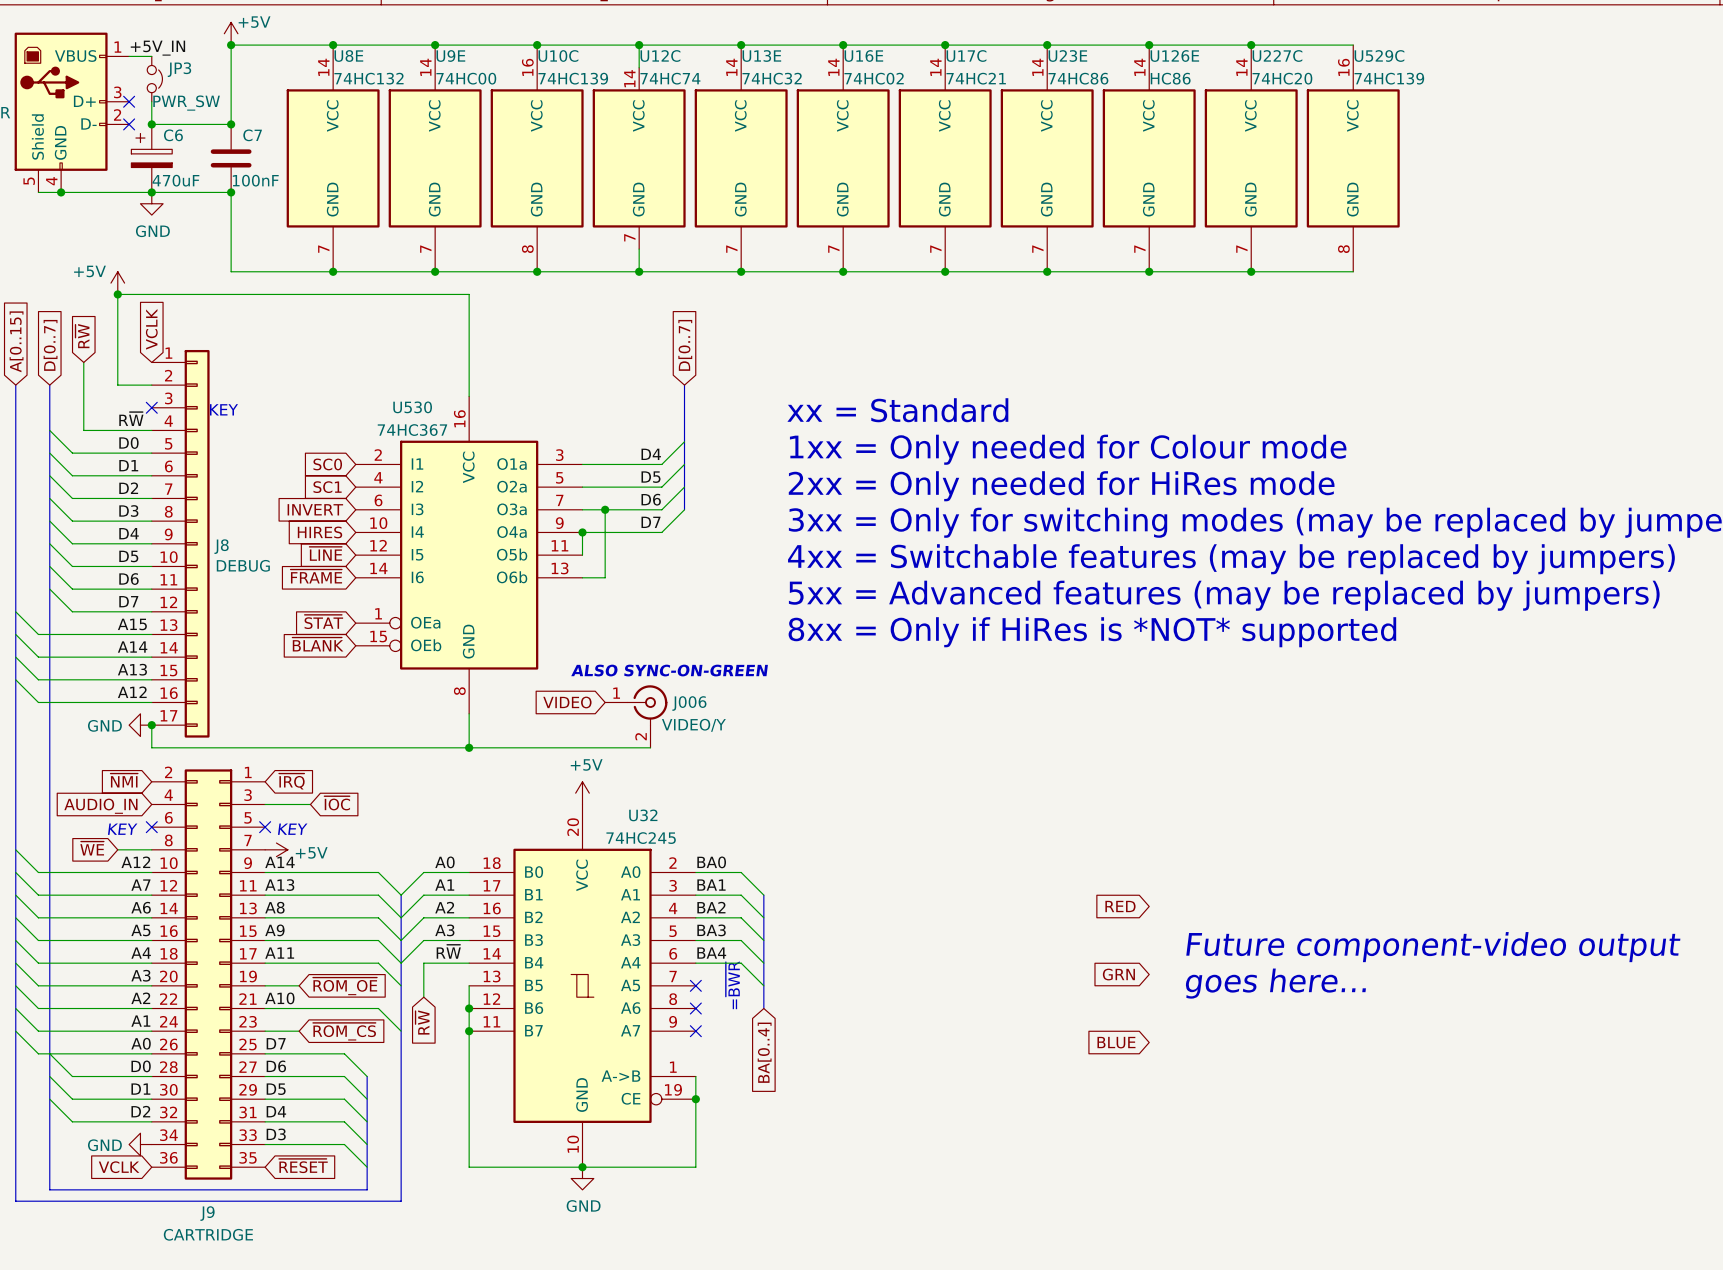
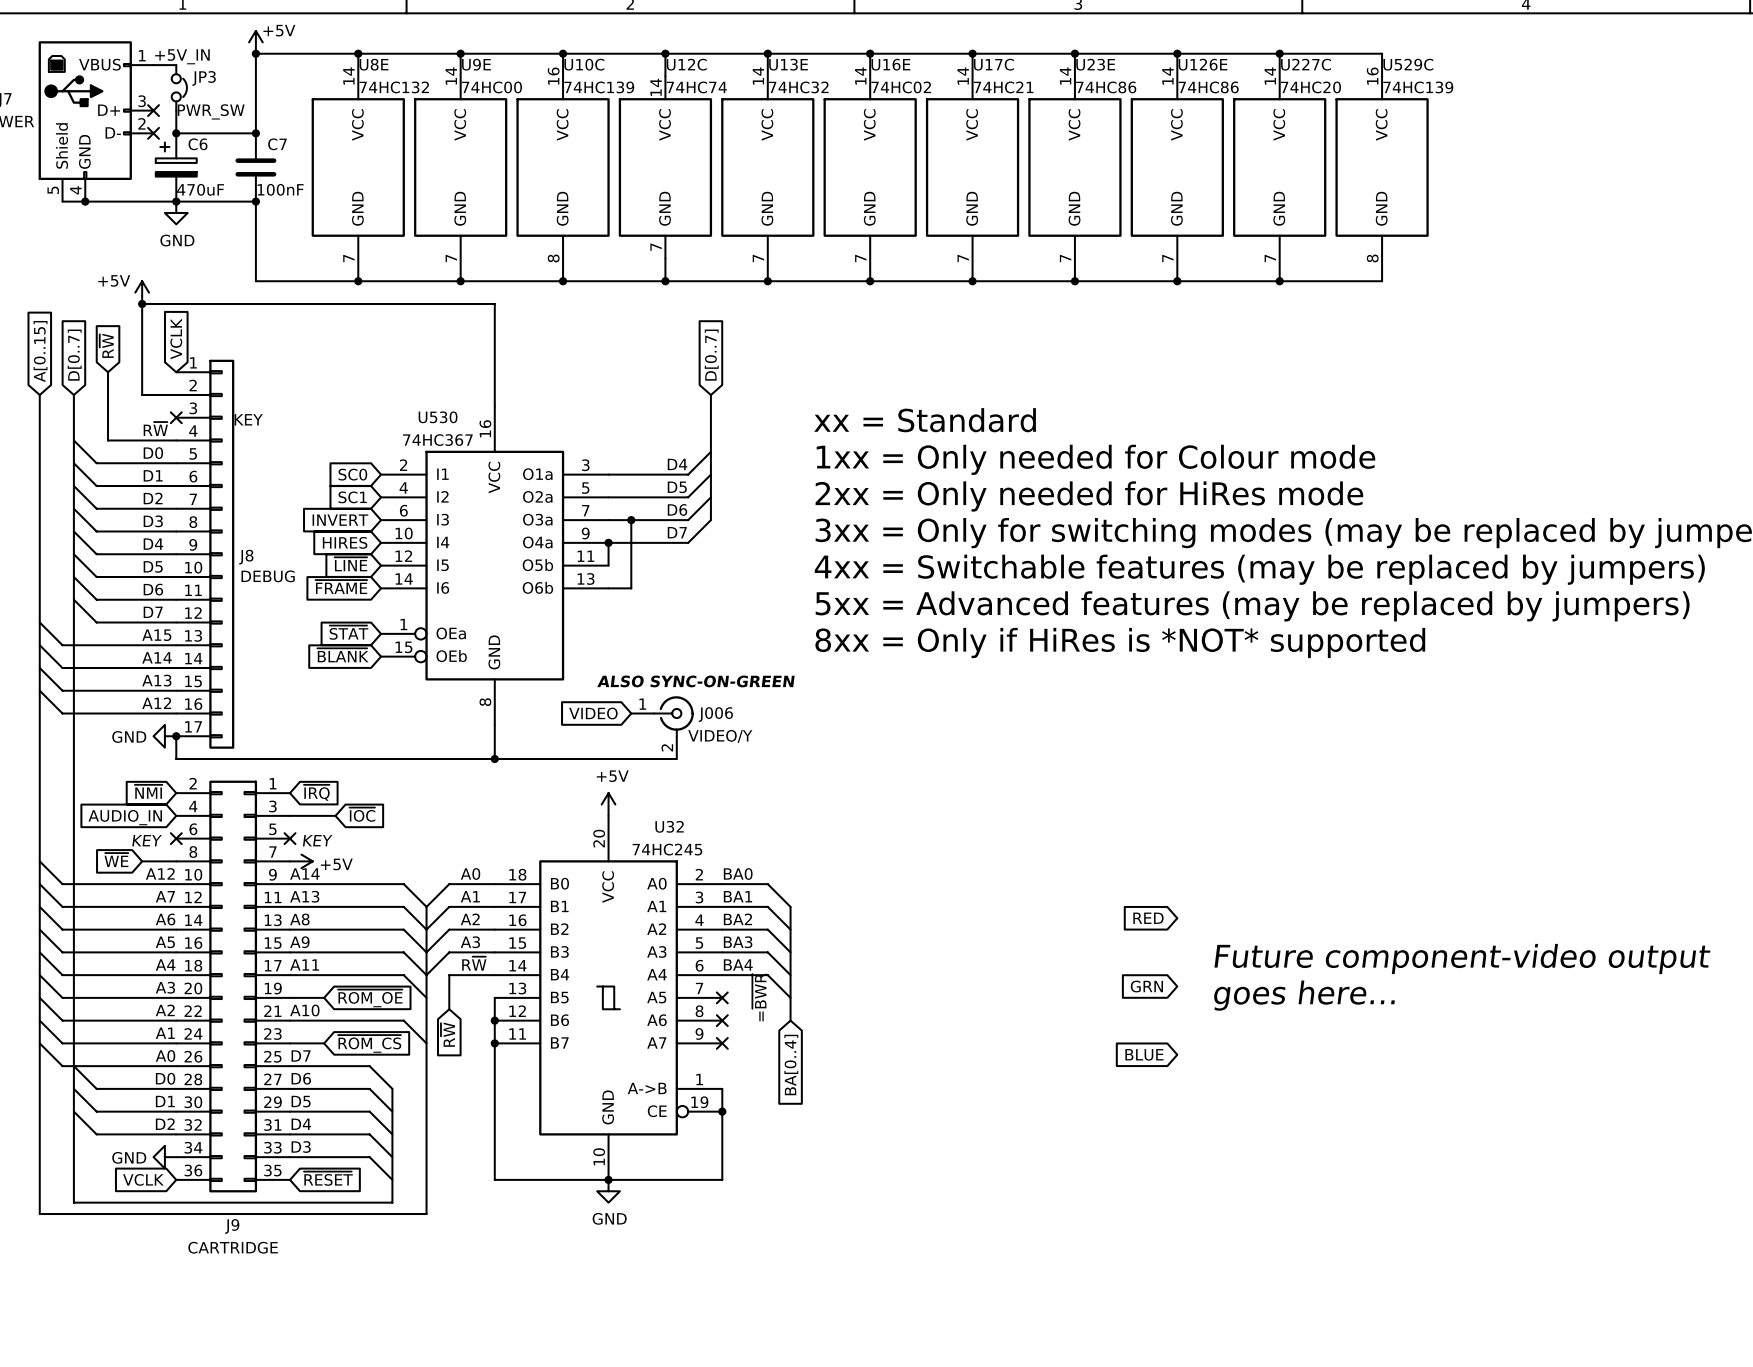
U126E value: HC86 (1170, 78) -> 74HC86 (1208, 87)

